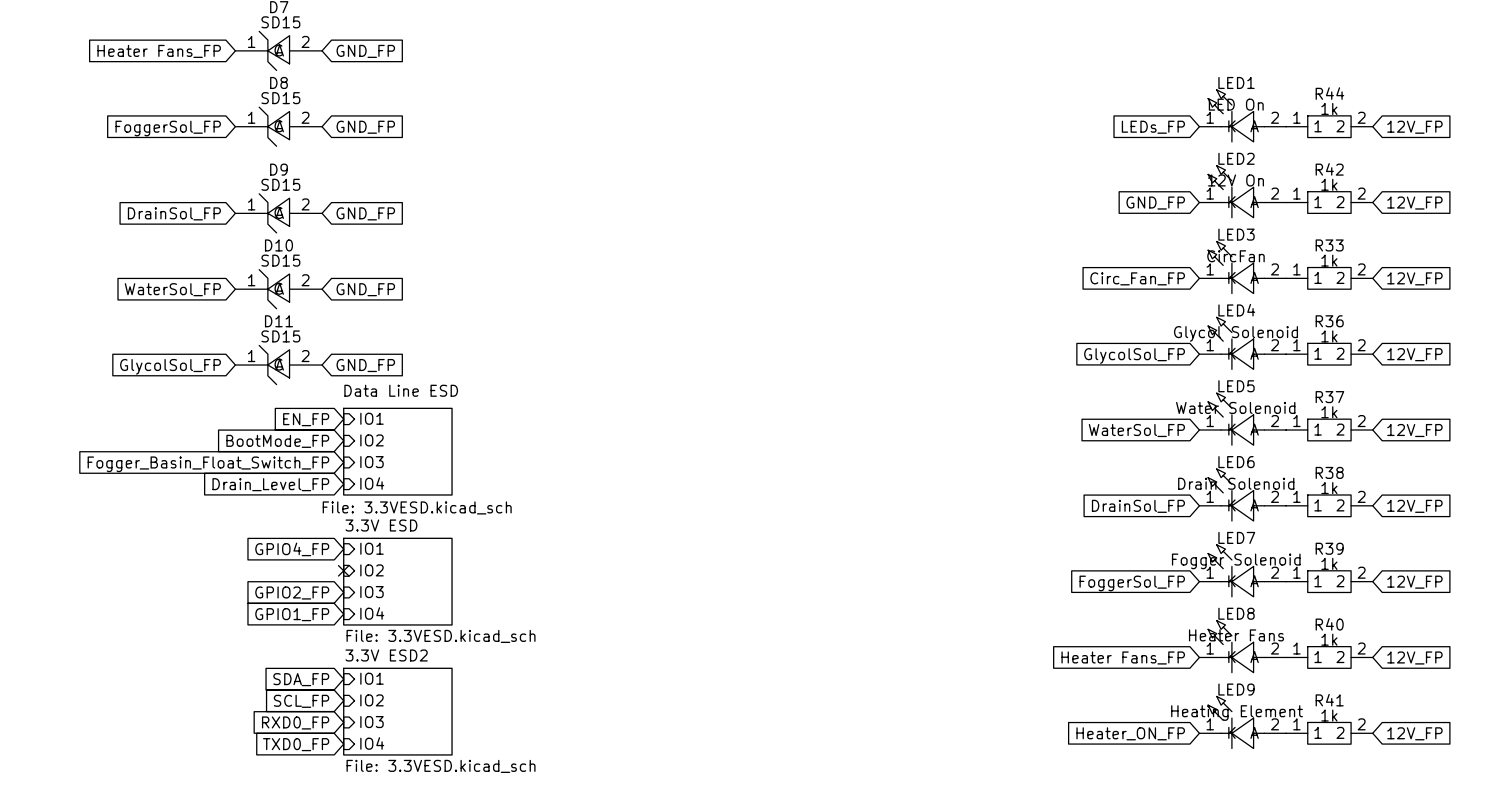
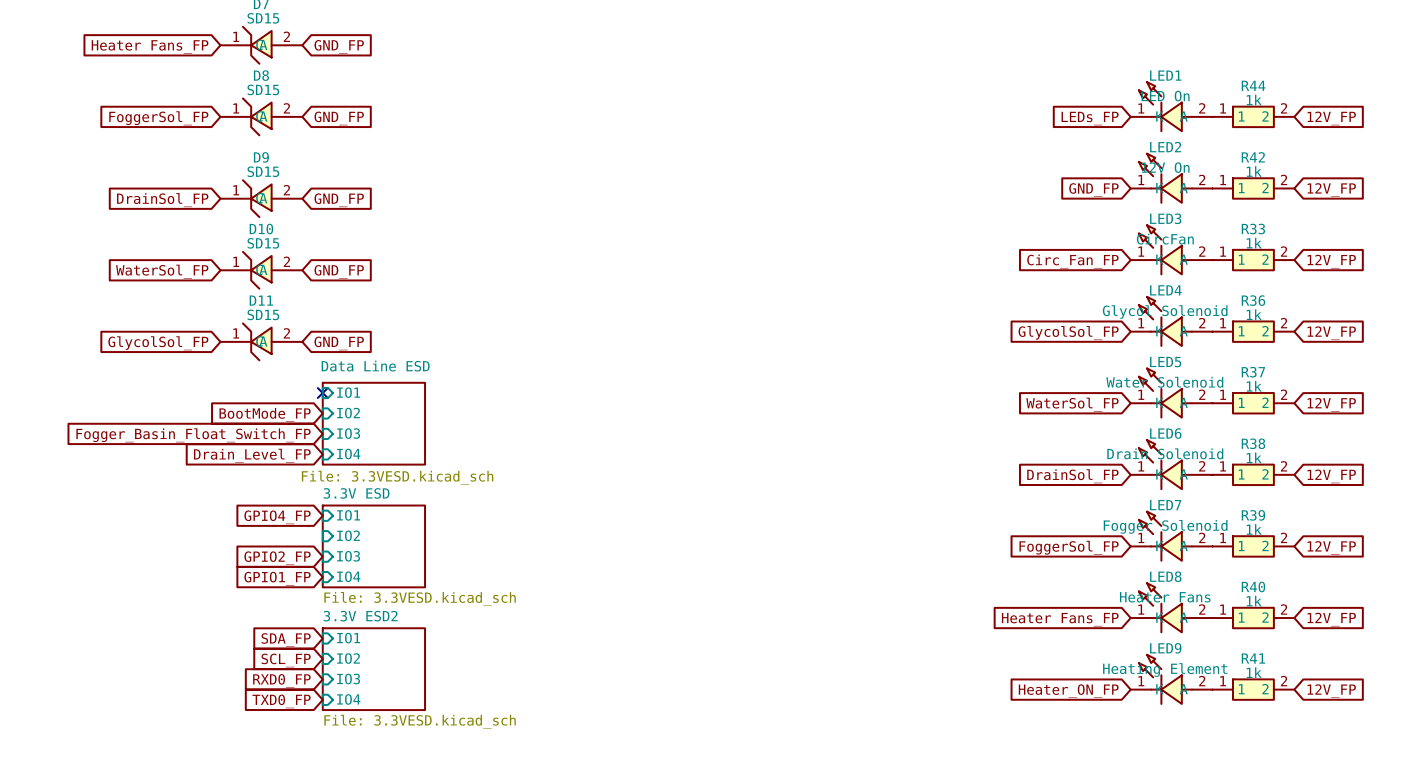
global label: EN_FP (306, 419) -> none
no-connect mark: none -> (322, 393)
no-connect mark: (343, 570) -> none

